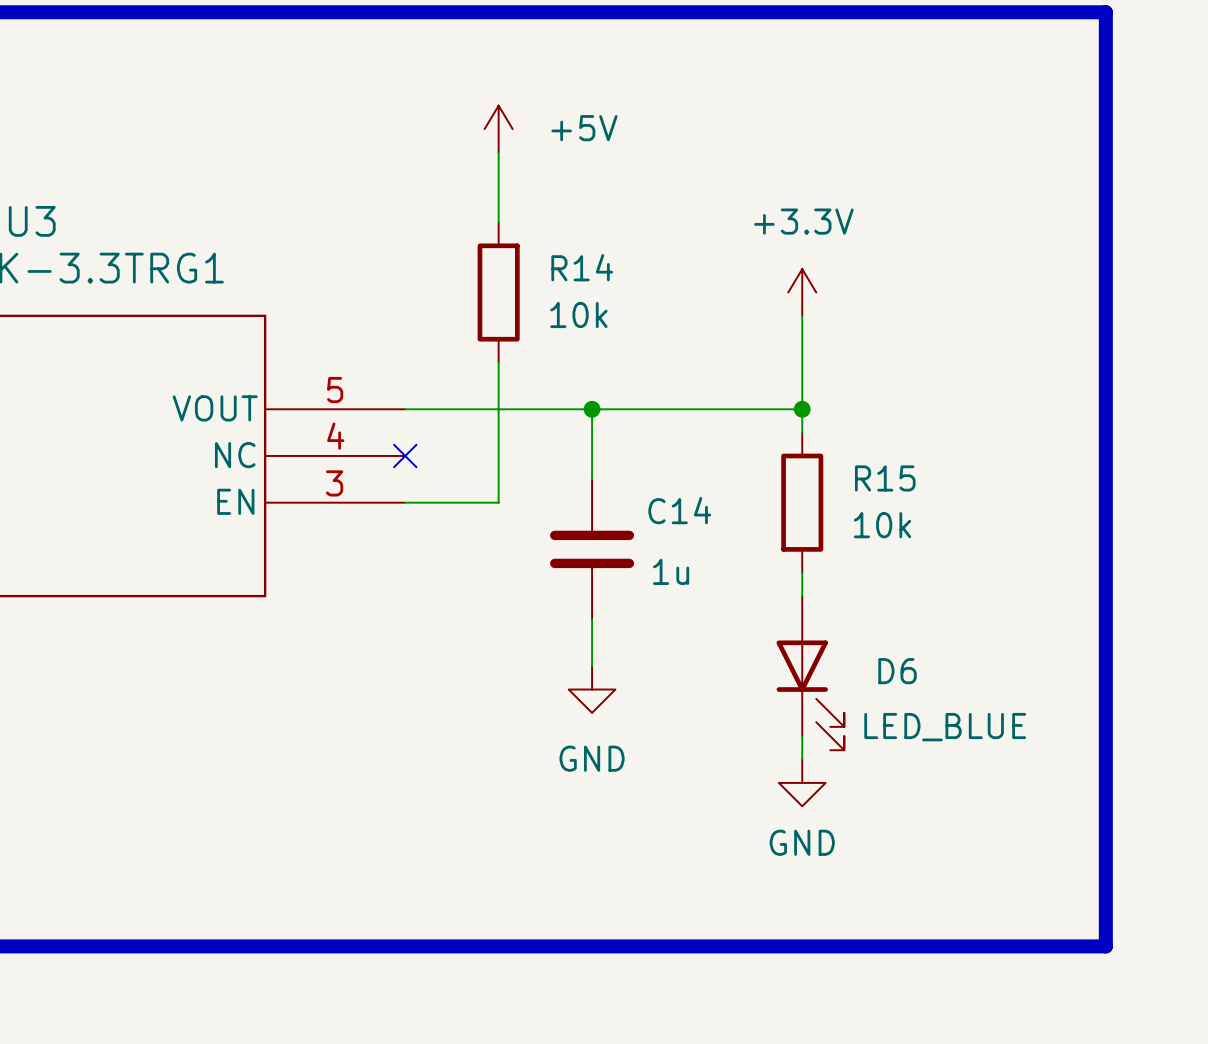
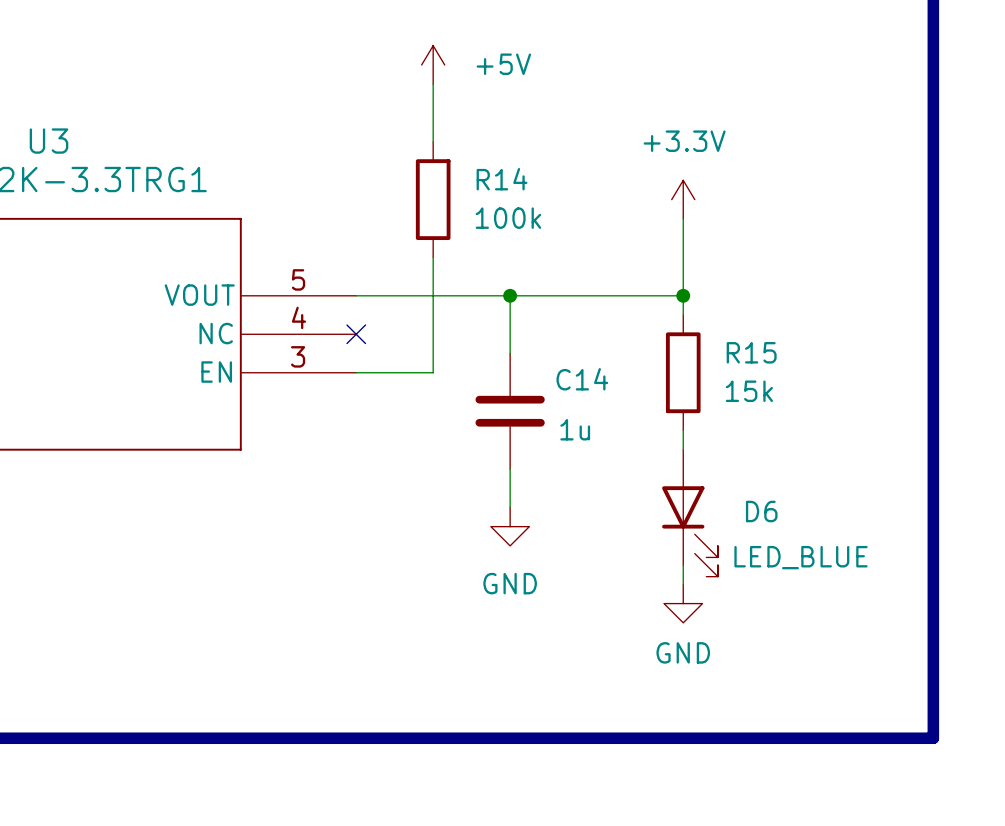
R14 value: 10k (578, 314) -> 100k (508, 218)
R15 value: 10k (882, 525) -> 15k (749, 391)

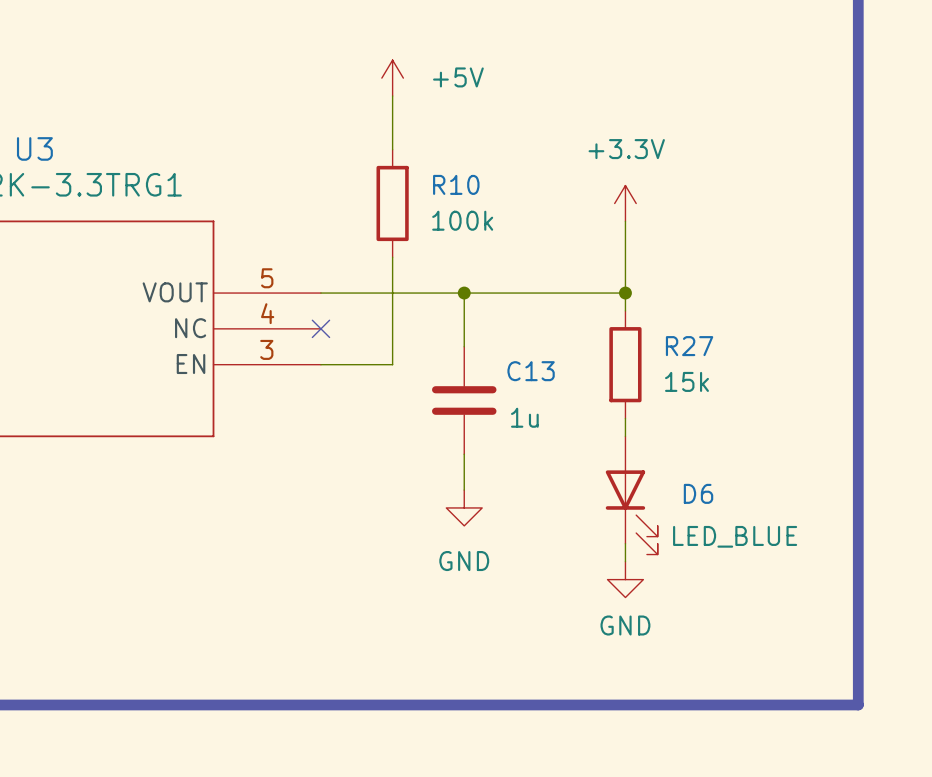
R14 name: R14 (502, 179) -> R10 (456, 184)
R15 name: R15 (751, 352) -> R27 (689, 346)
C14 name: C14 (582, 379) -> C13 (531, 371)

